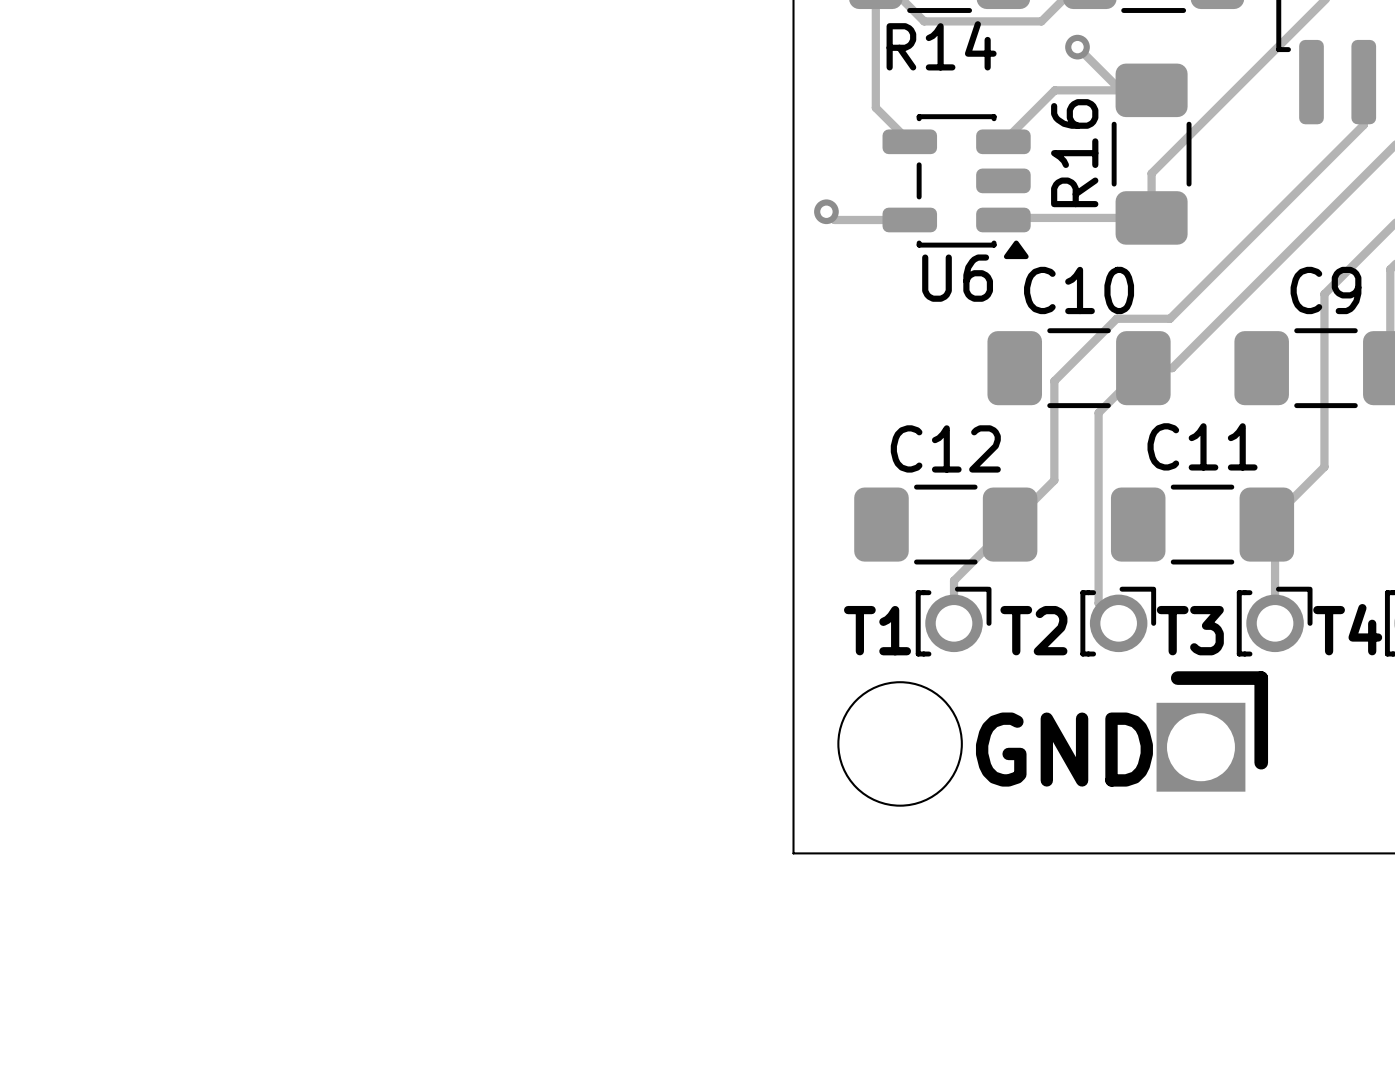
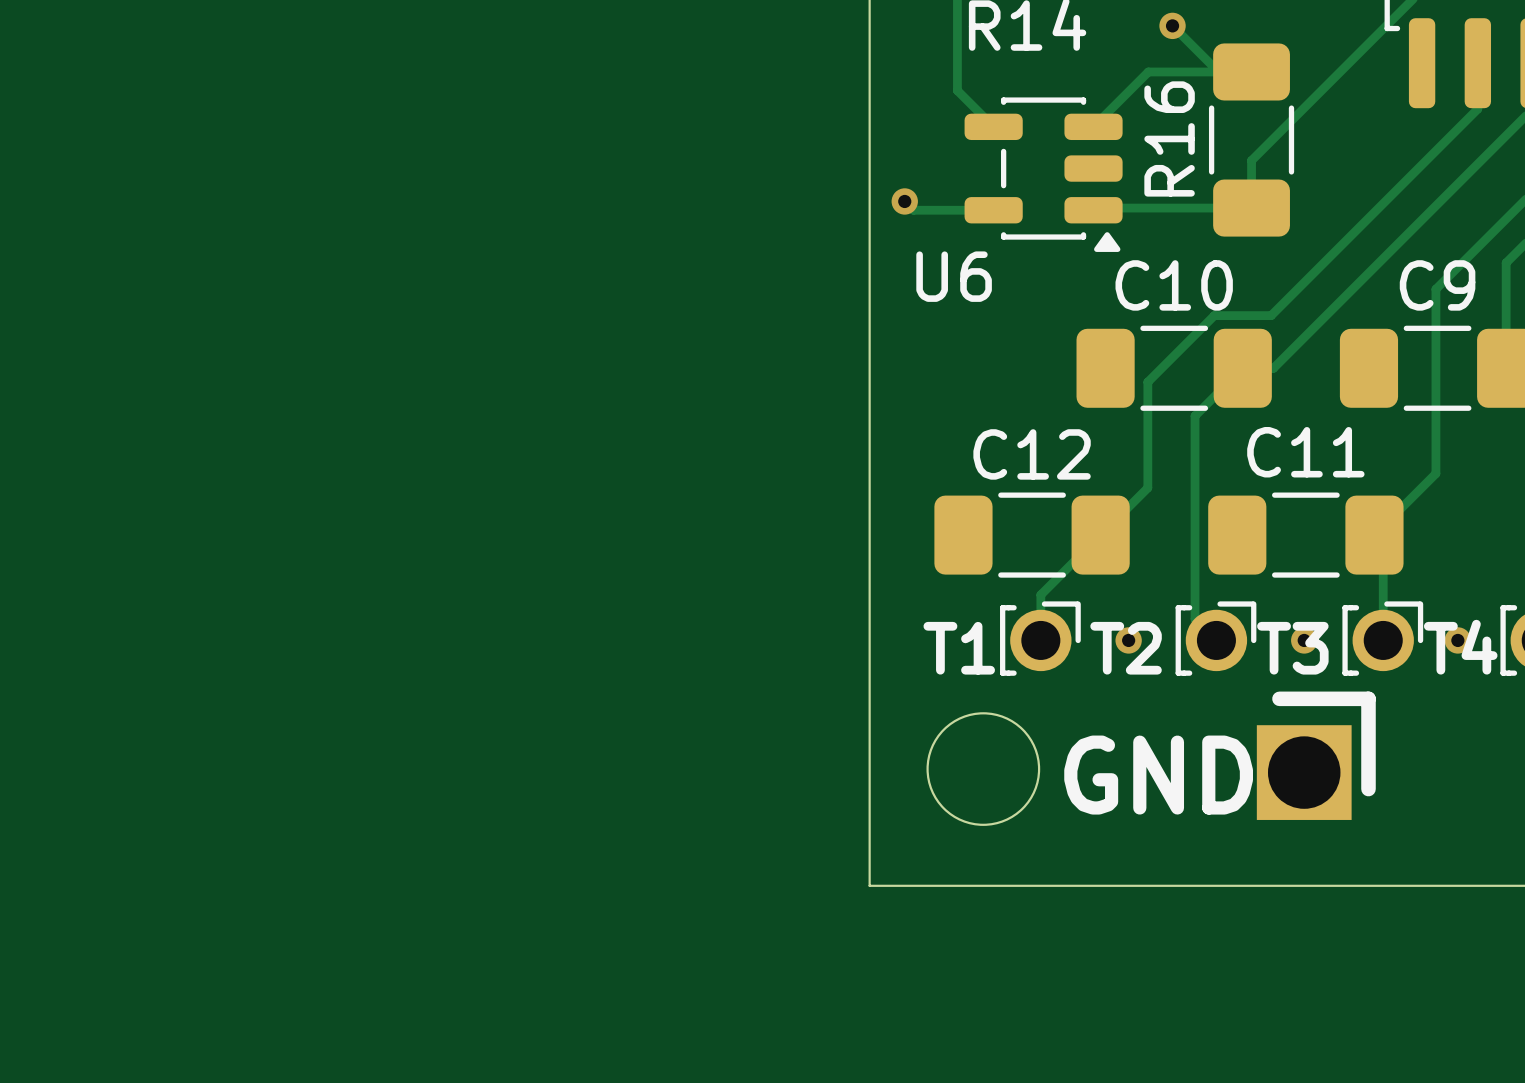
U6 name position: U6 (957, 278) -> U6 (954, 276)
via: none -> (1128, 640)
via: none -> (1304, 640)
via: none -> (1457, 640)
round board edge size: [837, 681, 963, 807] -> [926, 712, 1041, 826]

